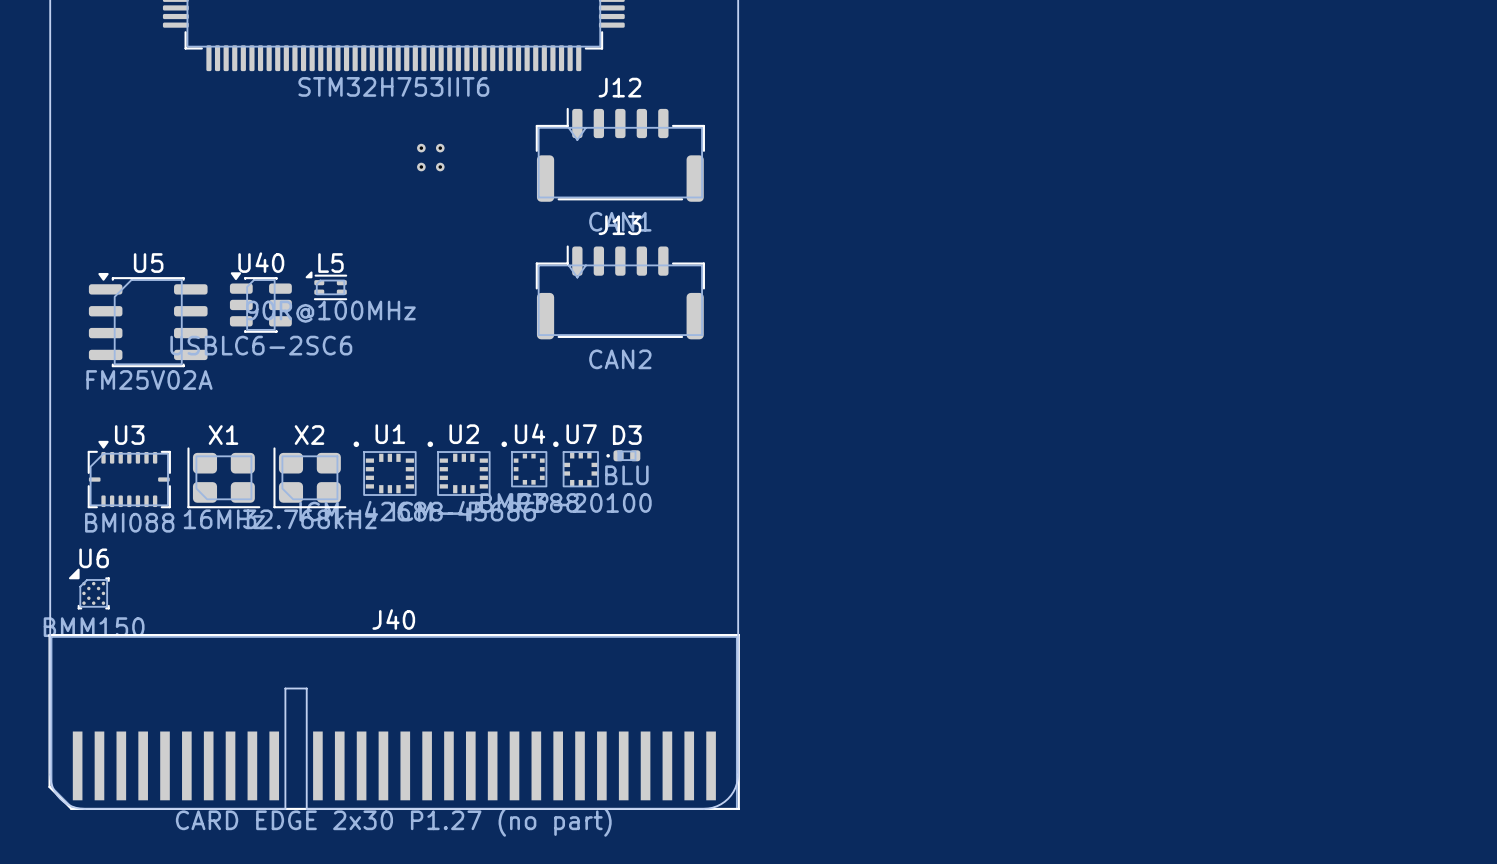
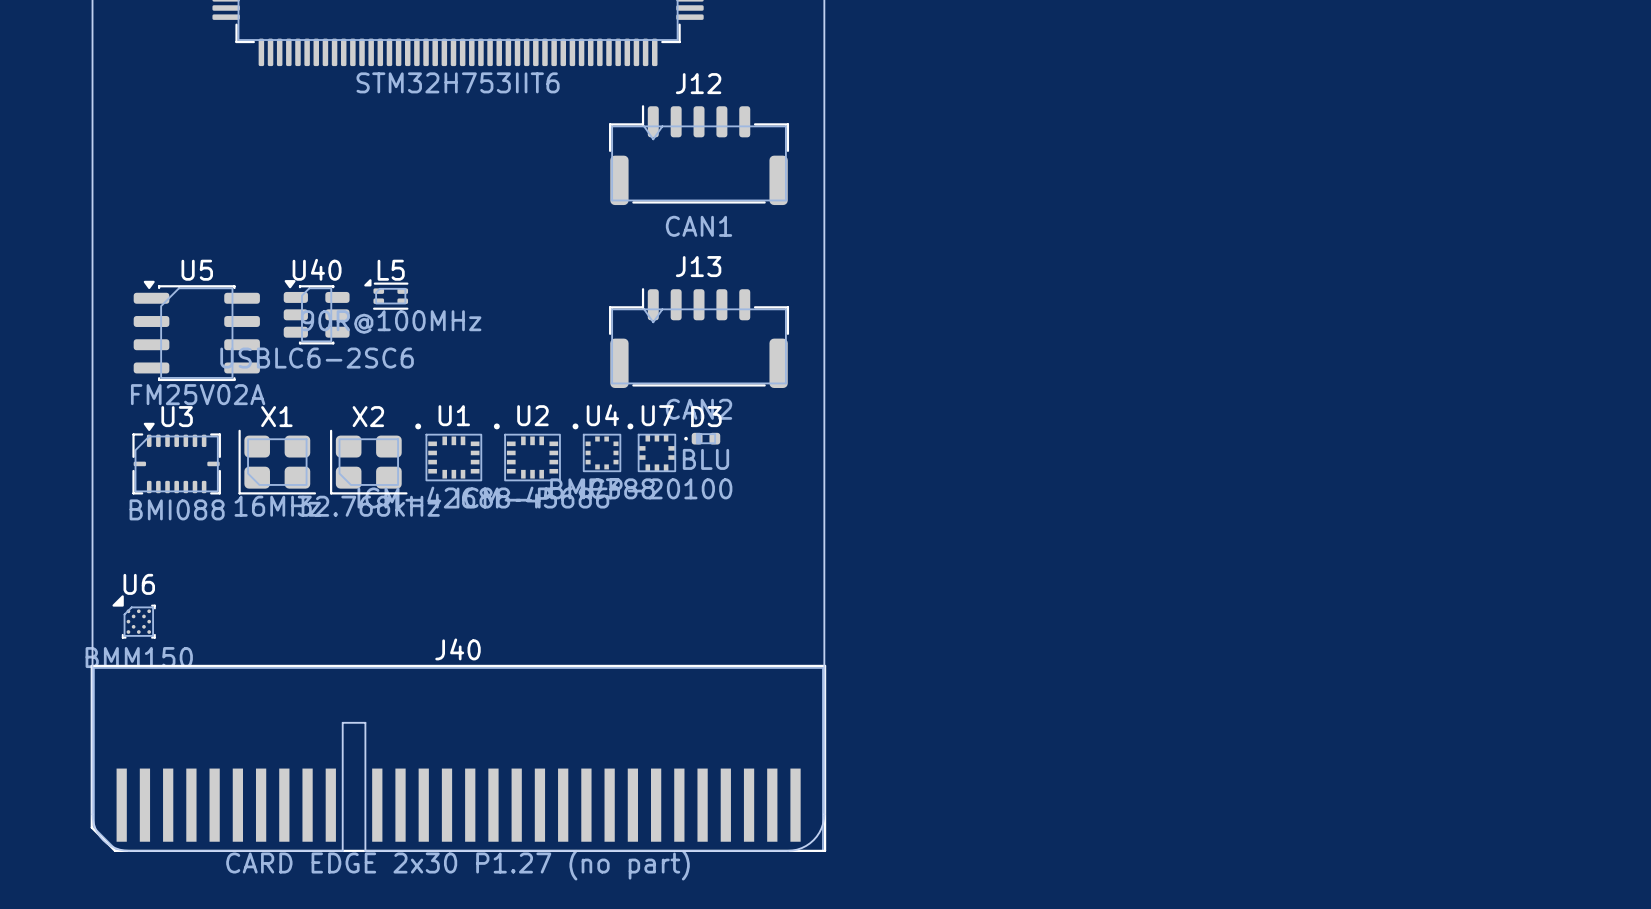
part: (430, 157) -> none
J13 position: (620, 292) -> (699, 338)
D3 position: (623, 455) -> (702, 438)
U4 position: (524, 464) -> (596, 447)
U7 position: (575, 464) -> (651, 447)
U1 position: (385, 468) -> (448, 452)
U2 position: (459, 468) -> (527, 452)
U3 position: (129, 474) -> (176, 458)
X1 position: (223, 477) -> (277, 462)
X2 position: (309, 477) -> (368, 462)

